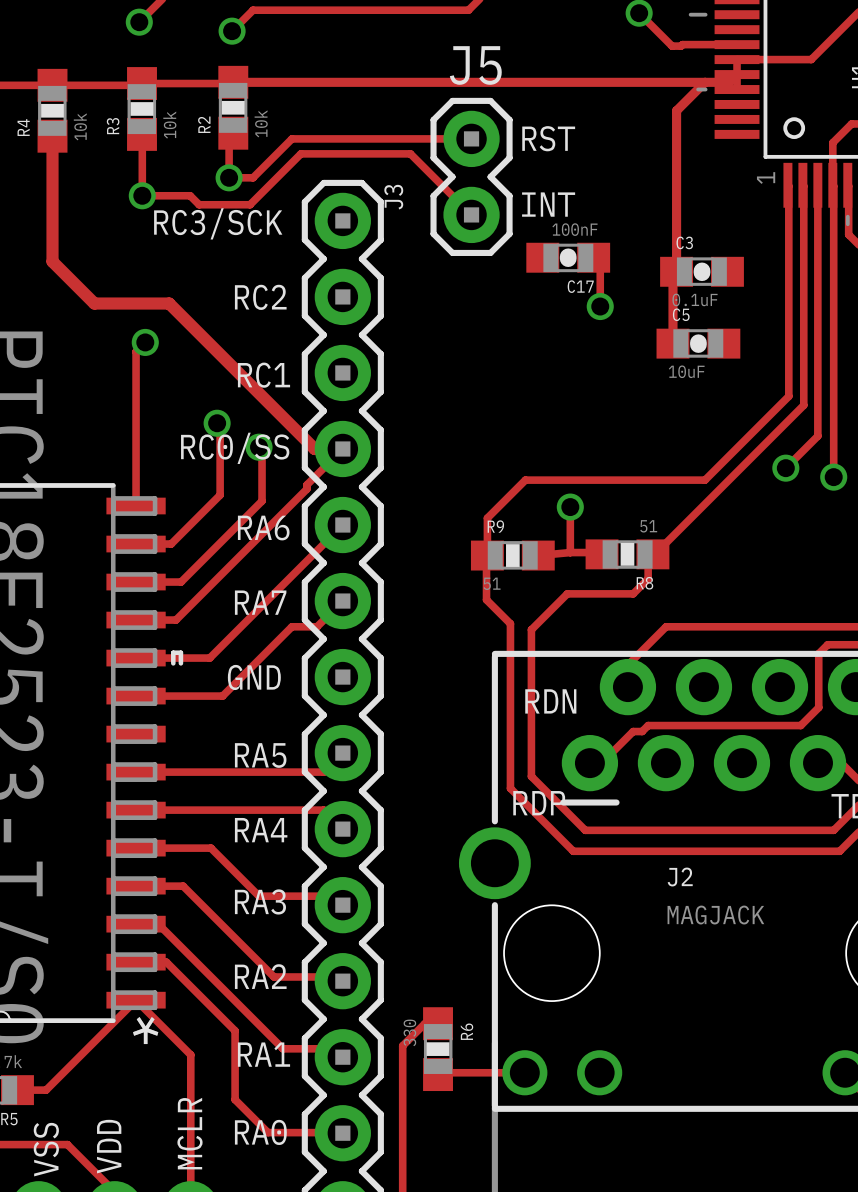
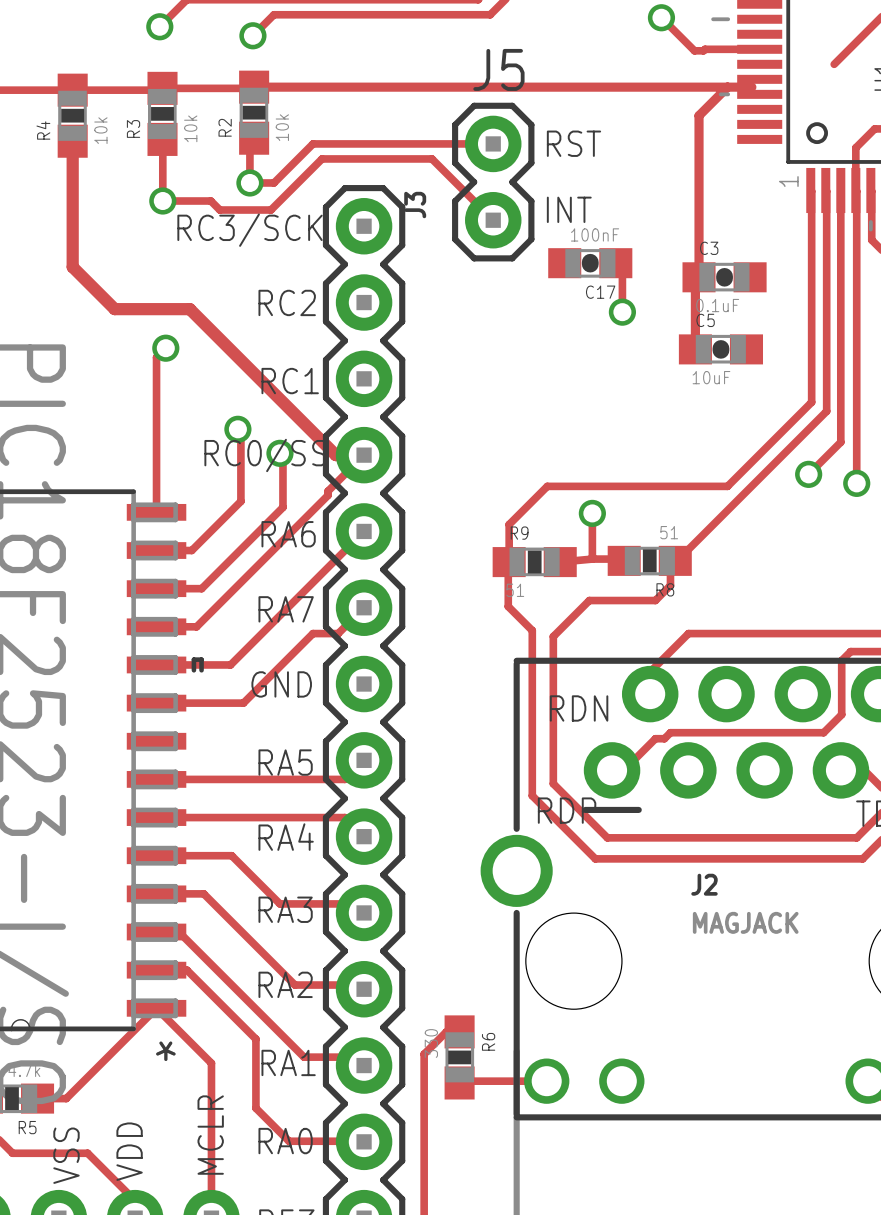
track: (811, 59) (737, 59) (737, 89) -> none

